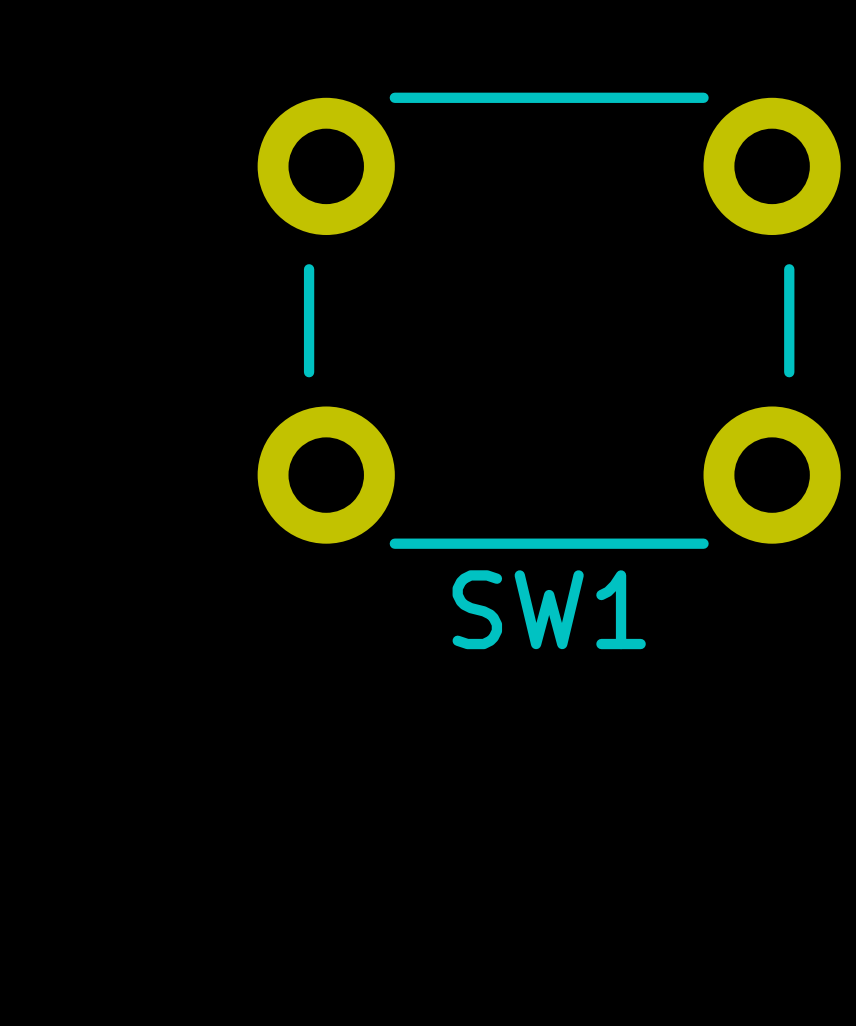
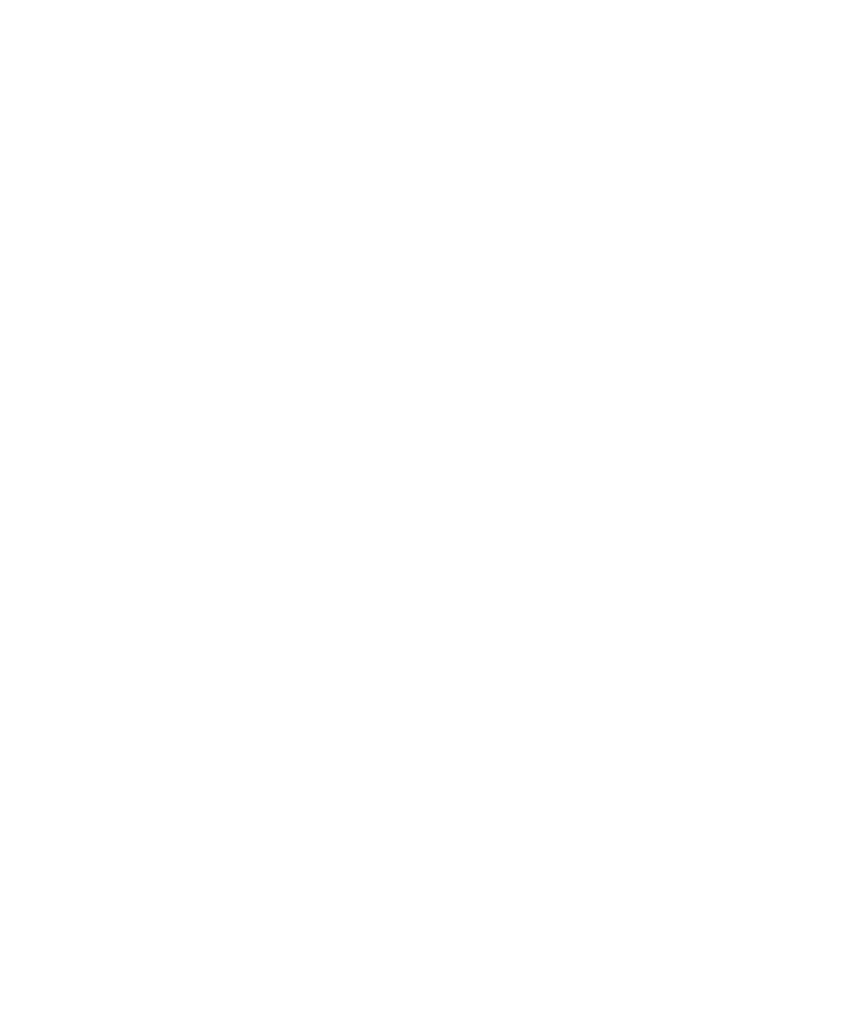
SW1: (549, 320) -> none

